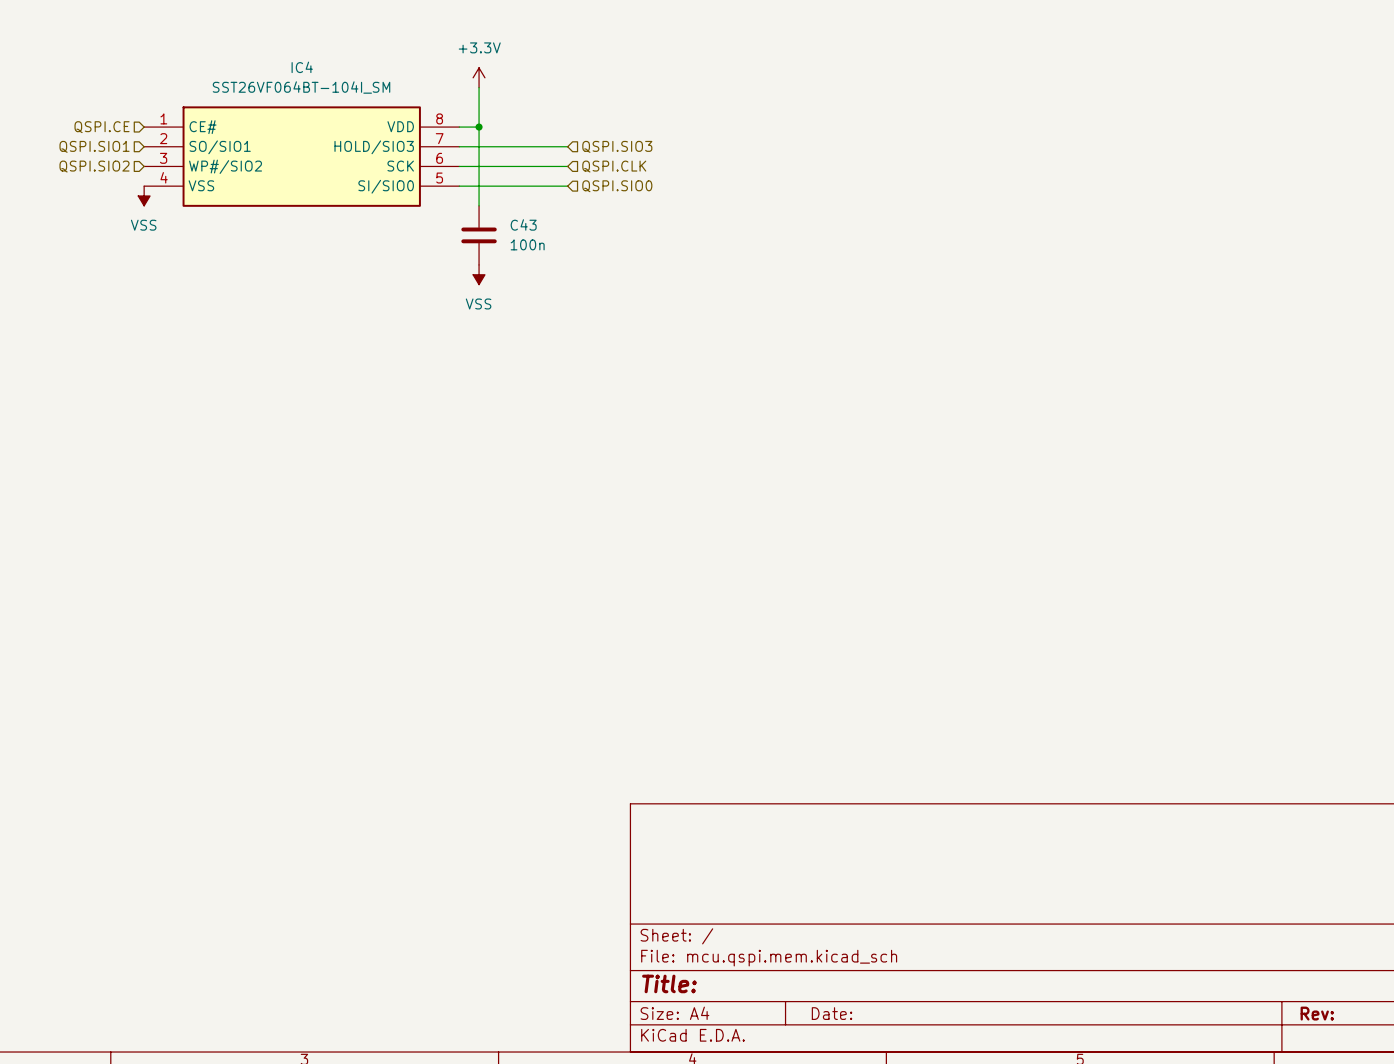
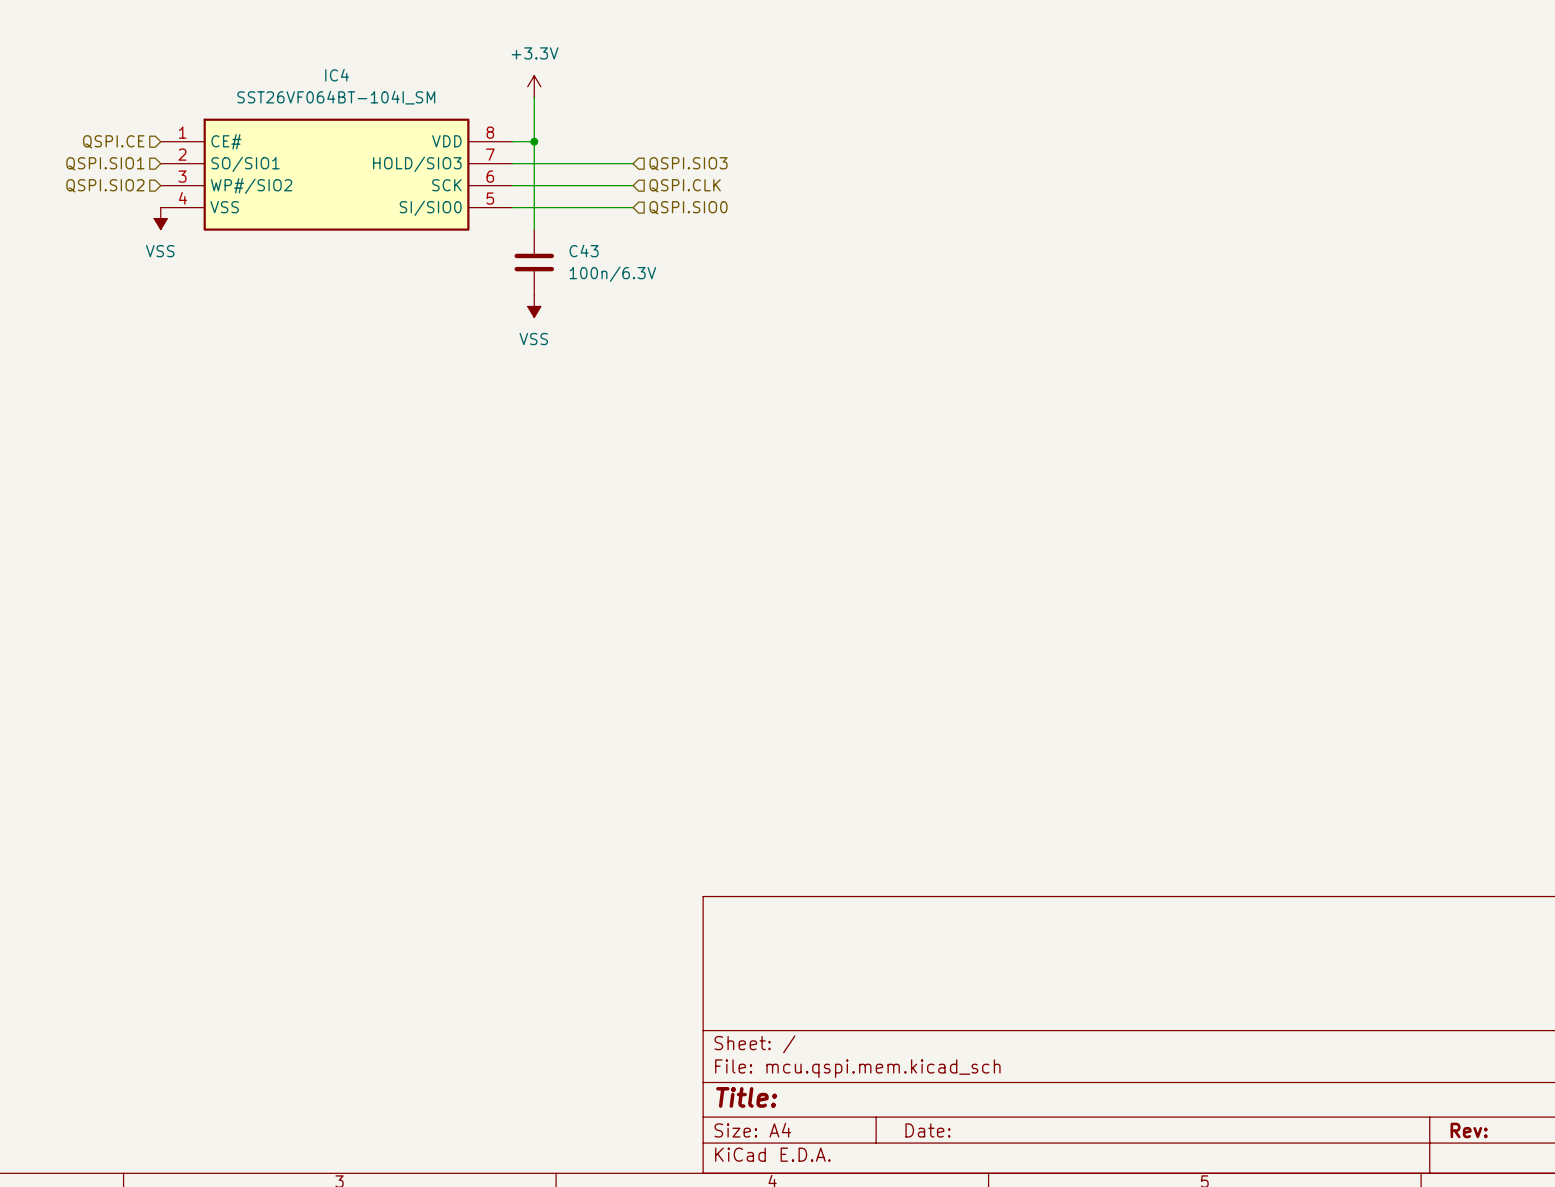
C43 value: 100n (527, 244) -> 100n/6.3V (612, 274)

